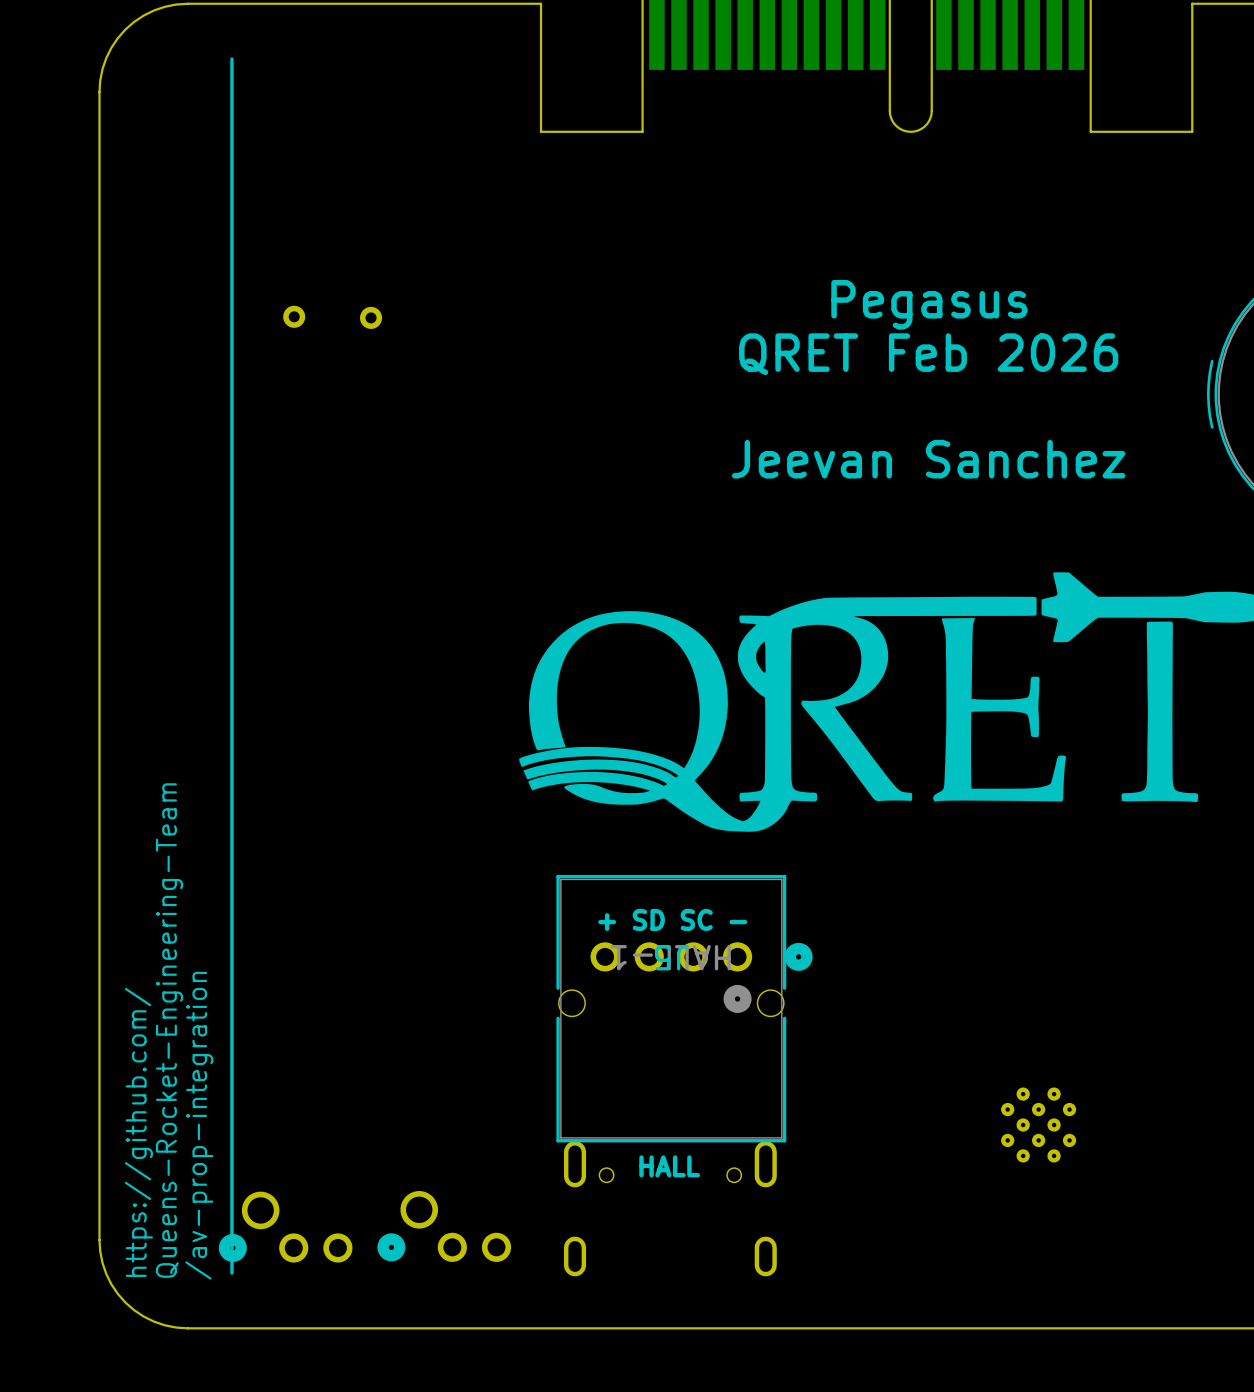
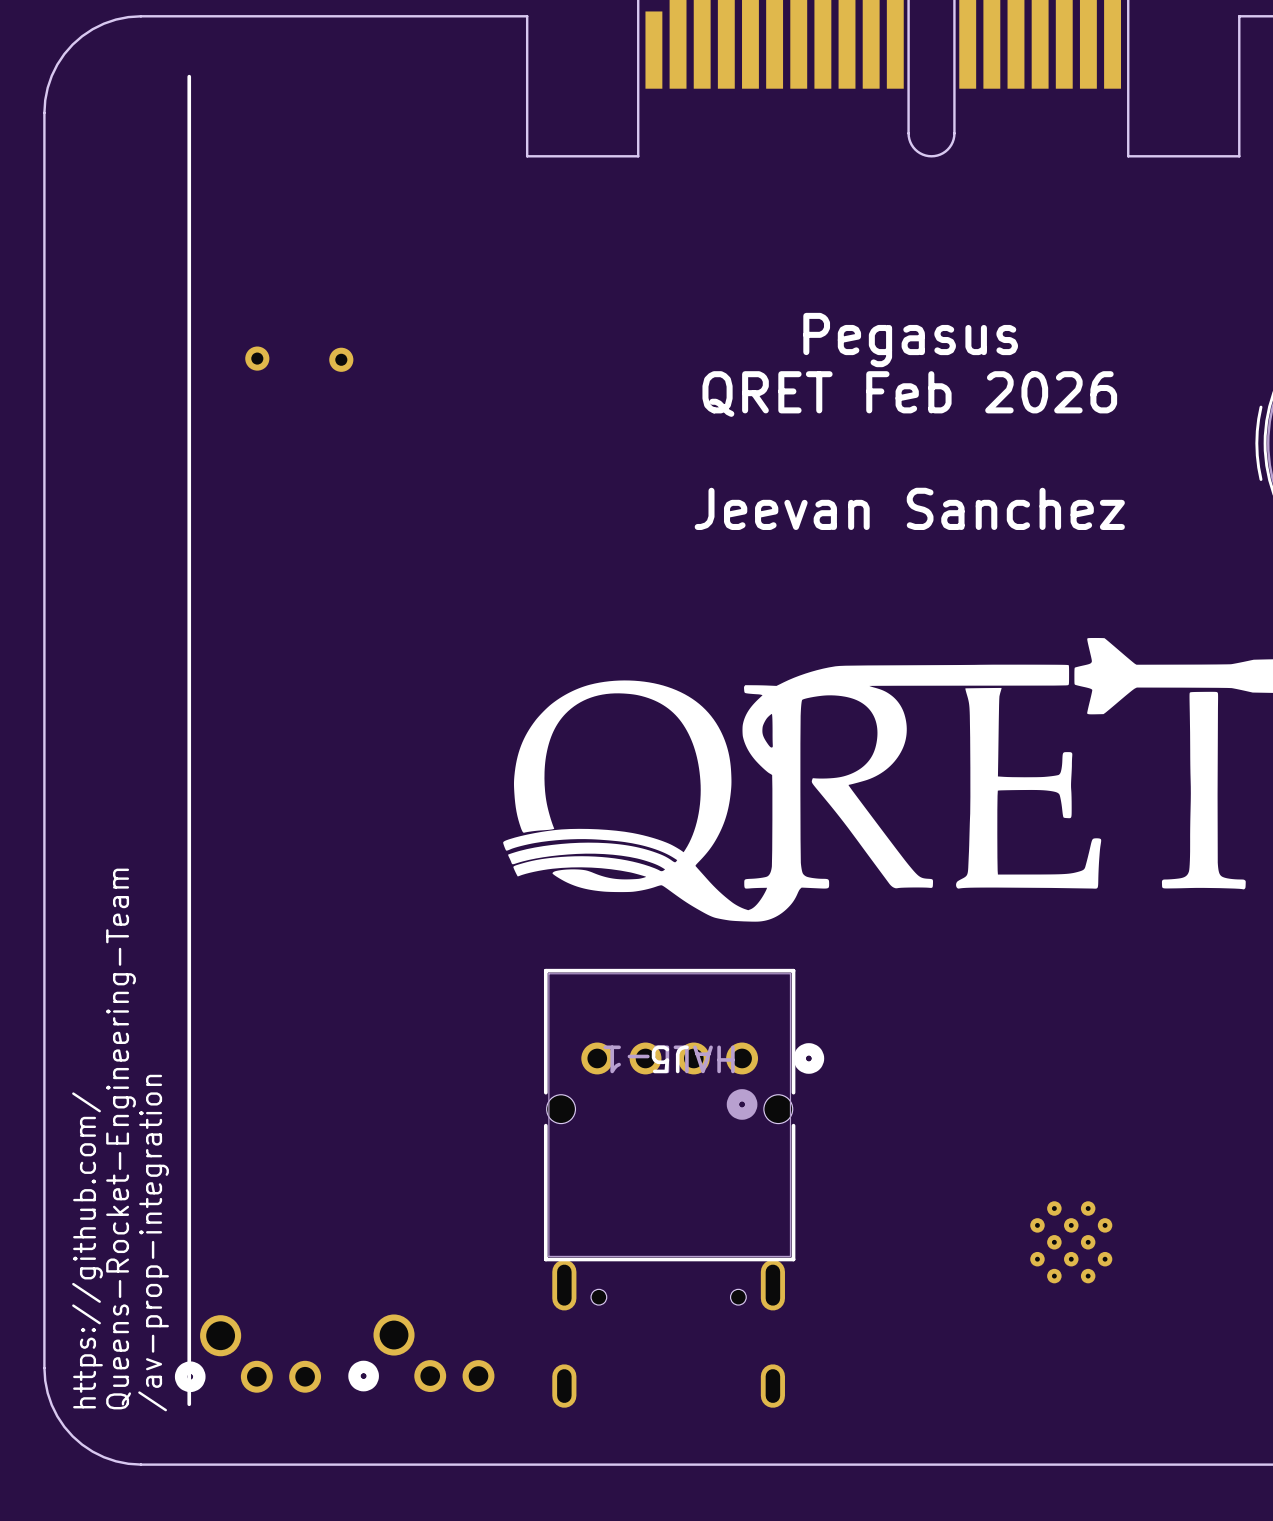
text position: Pegasus (929, 304) -> Pegasus (910, 340)
text position: QRET Feb 2026 (928, 354) -> QRET Feb 2026 (909, 394)
text position: Jeevan Sanchez (928, 459) -> Jeevan Sanchez (909, 508)
text: + SD SC - (672, 919) -> none
text: HALL (669, 1166) -> none

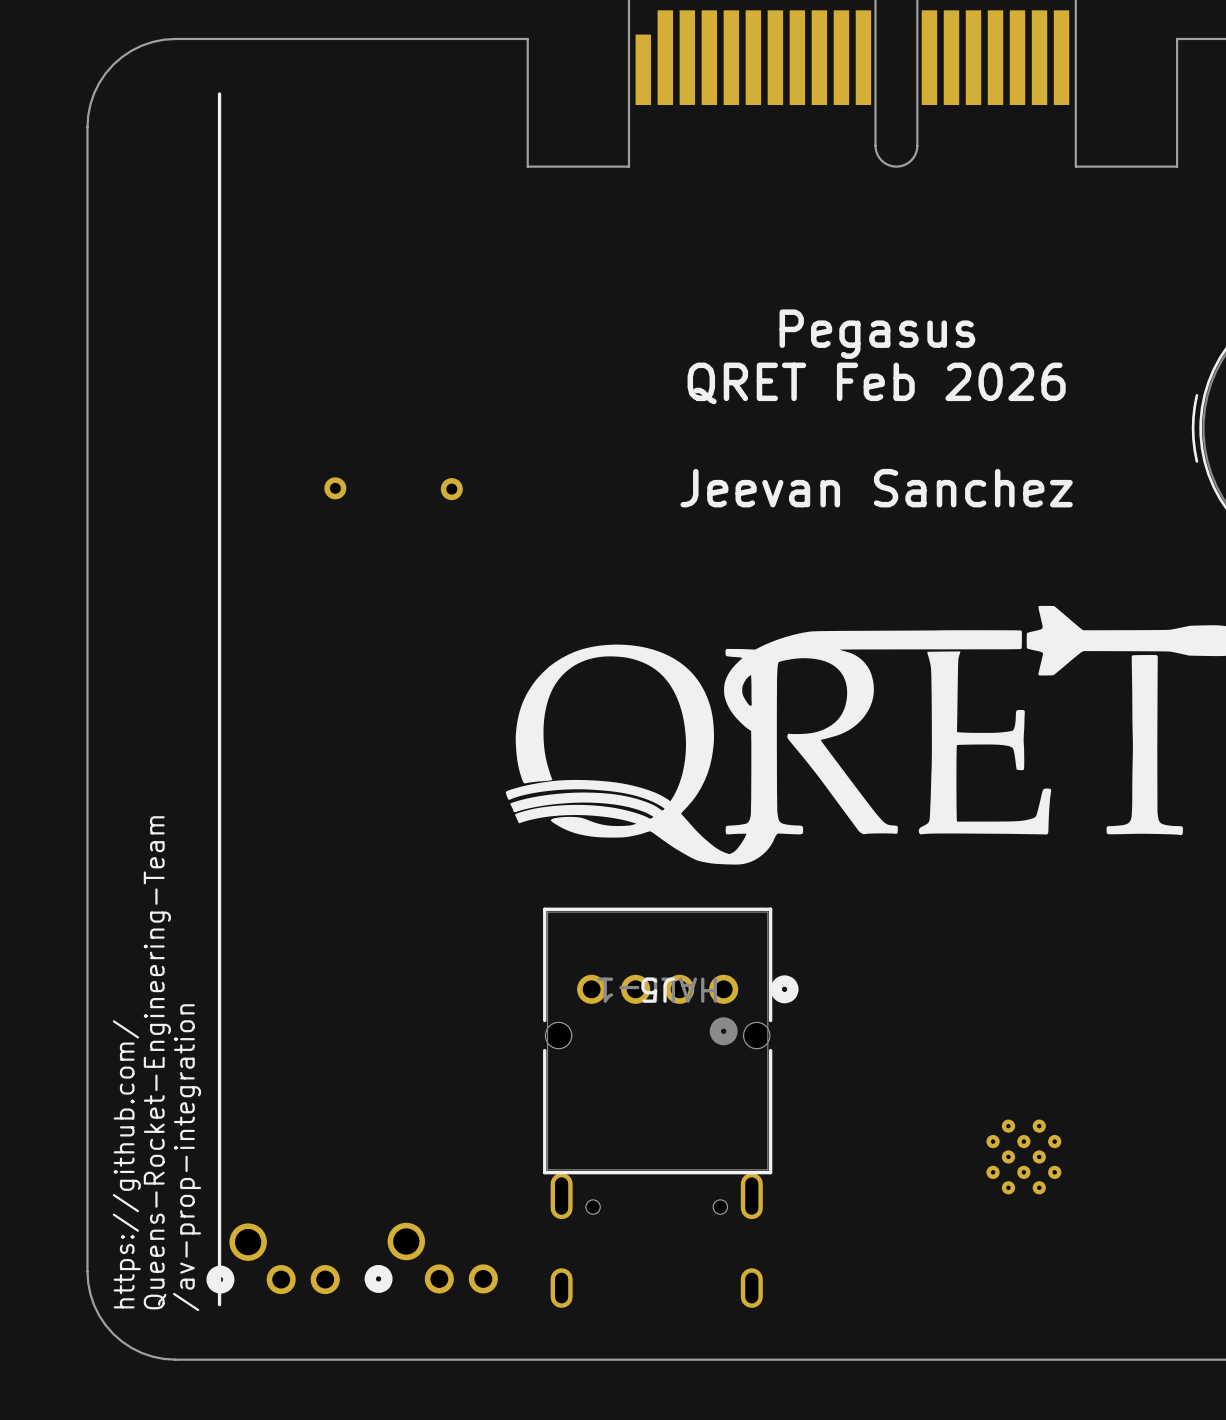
part: (257, 358) -> none
part: (341, 359) -> none
part: none -> (335, 488)
part: none -> (451, 489)

